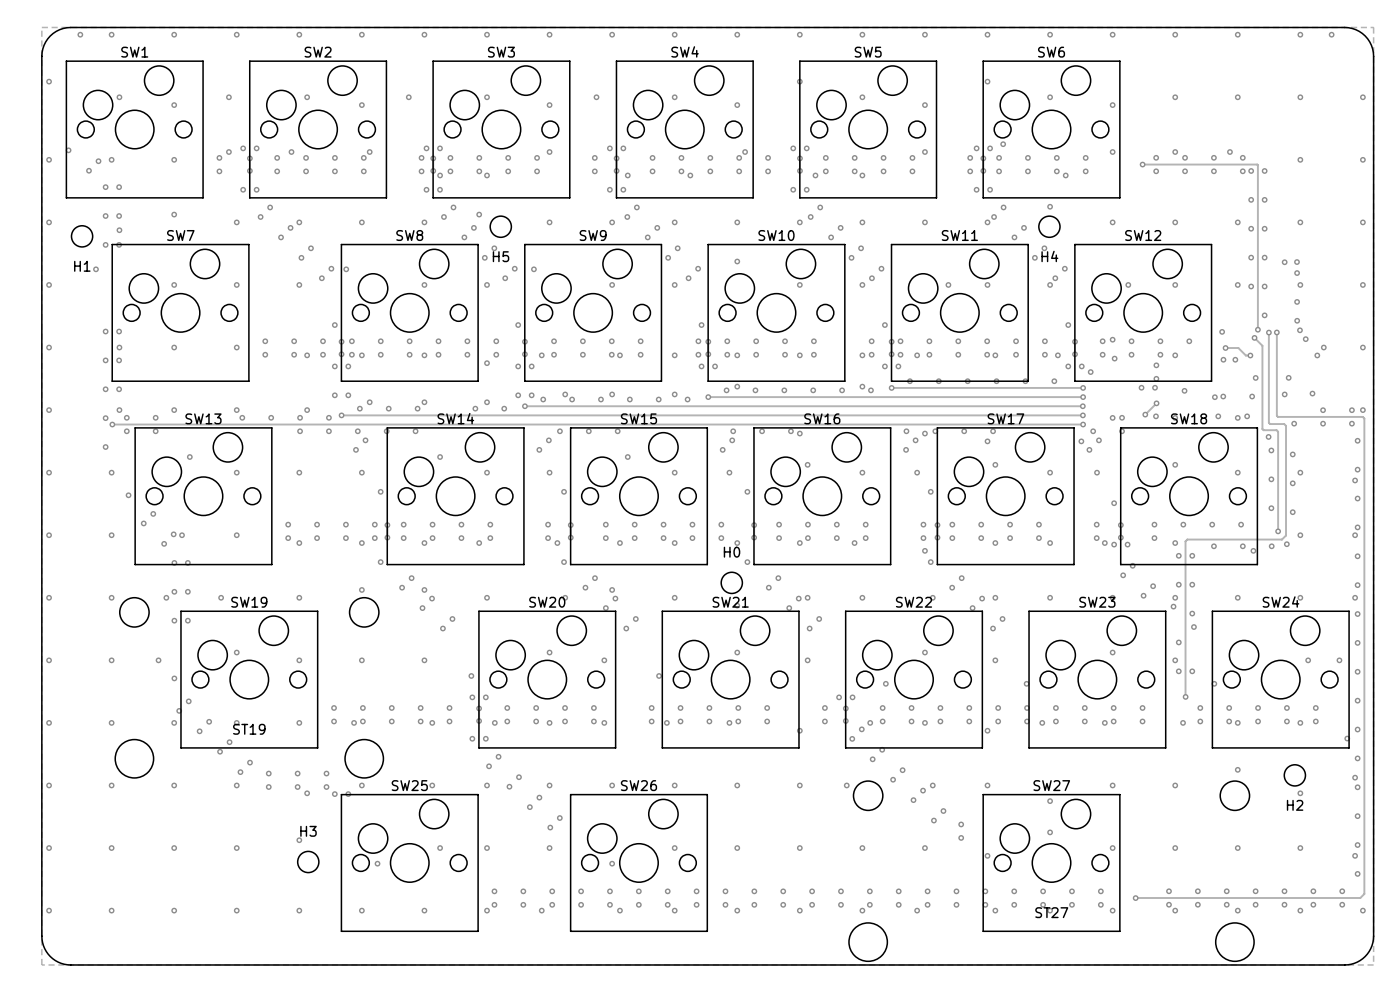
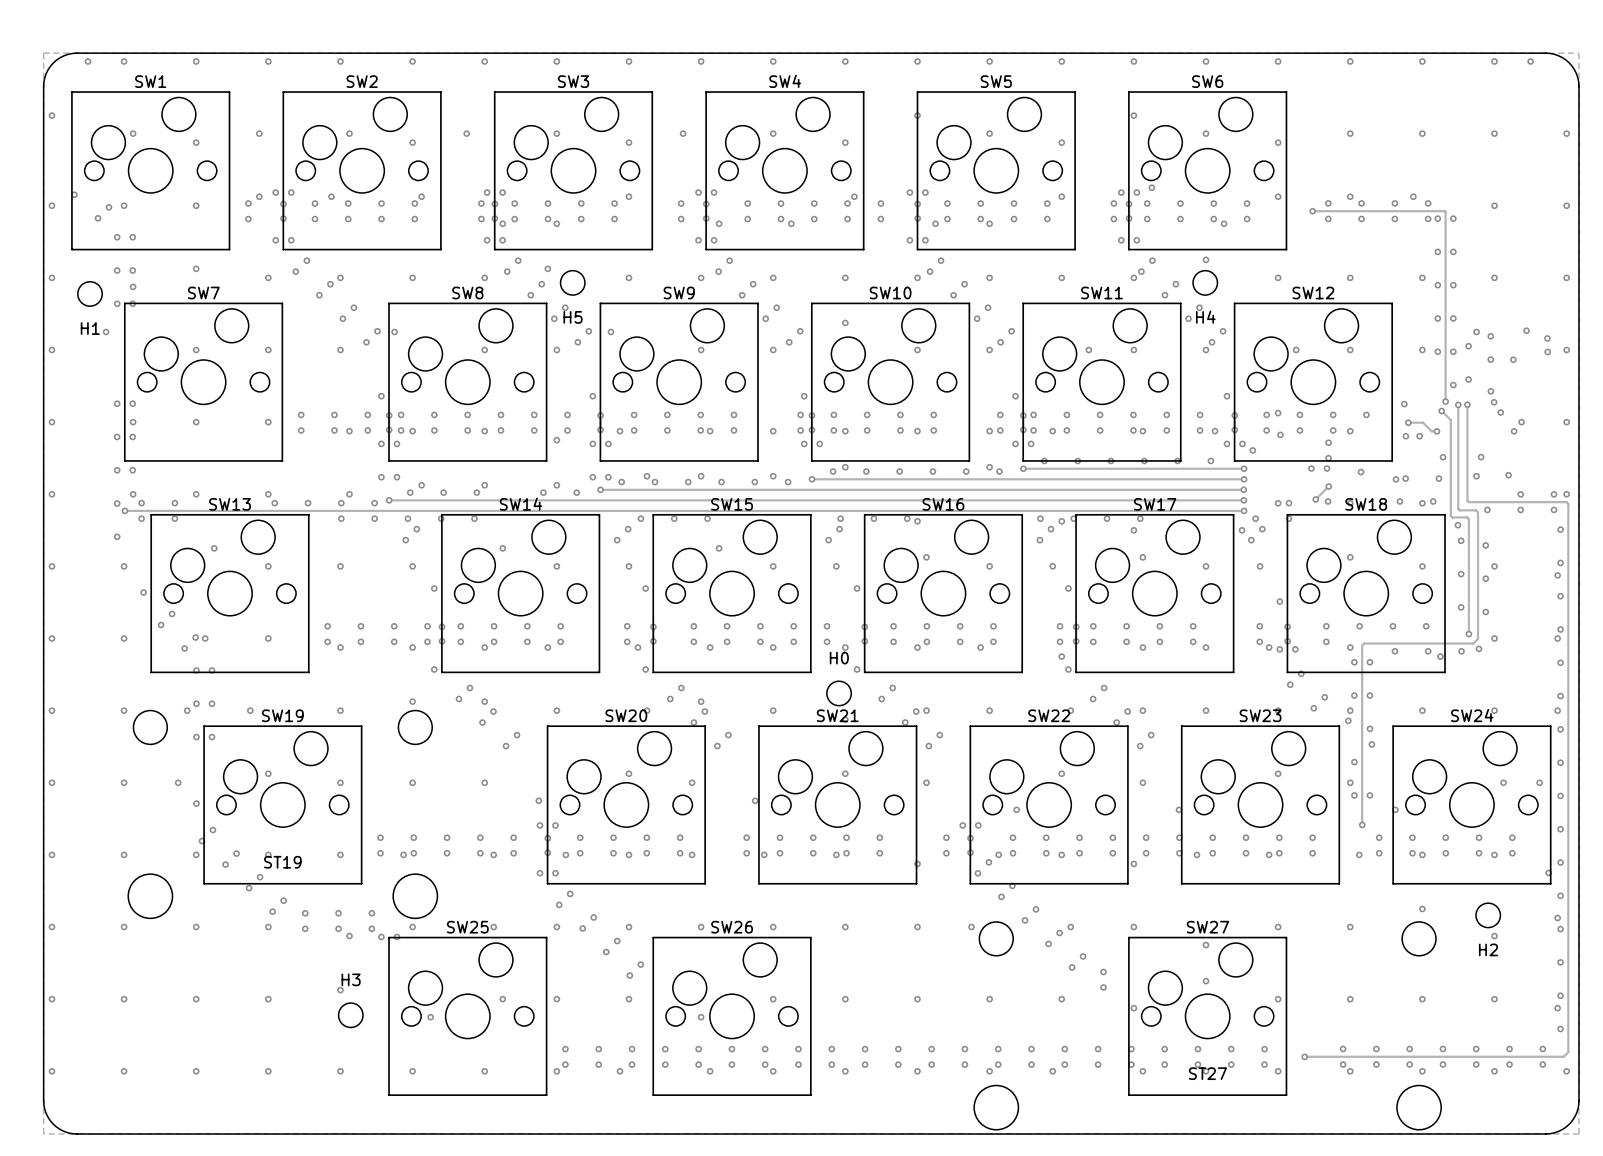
via: (1284, 262) -> none
via: (1296, 262) -> none
via: none -> (1526, 330)
via: none -> (1476, 331)
via: none -> (1547, 338)
via: none -> (1468, 346)
via: (1300, 284) -> none
via: none -> (1547, 352)
via: none -> (1490, 359)
via: none -> (1513, 359)
via: (1297, 301) -> none
via: none -> (1468, 379)

